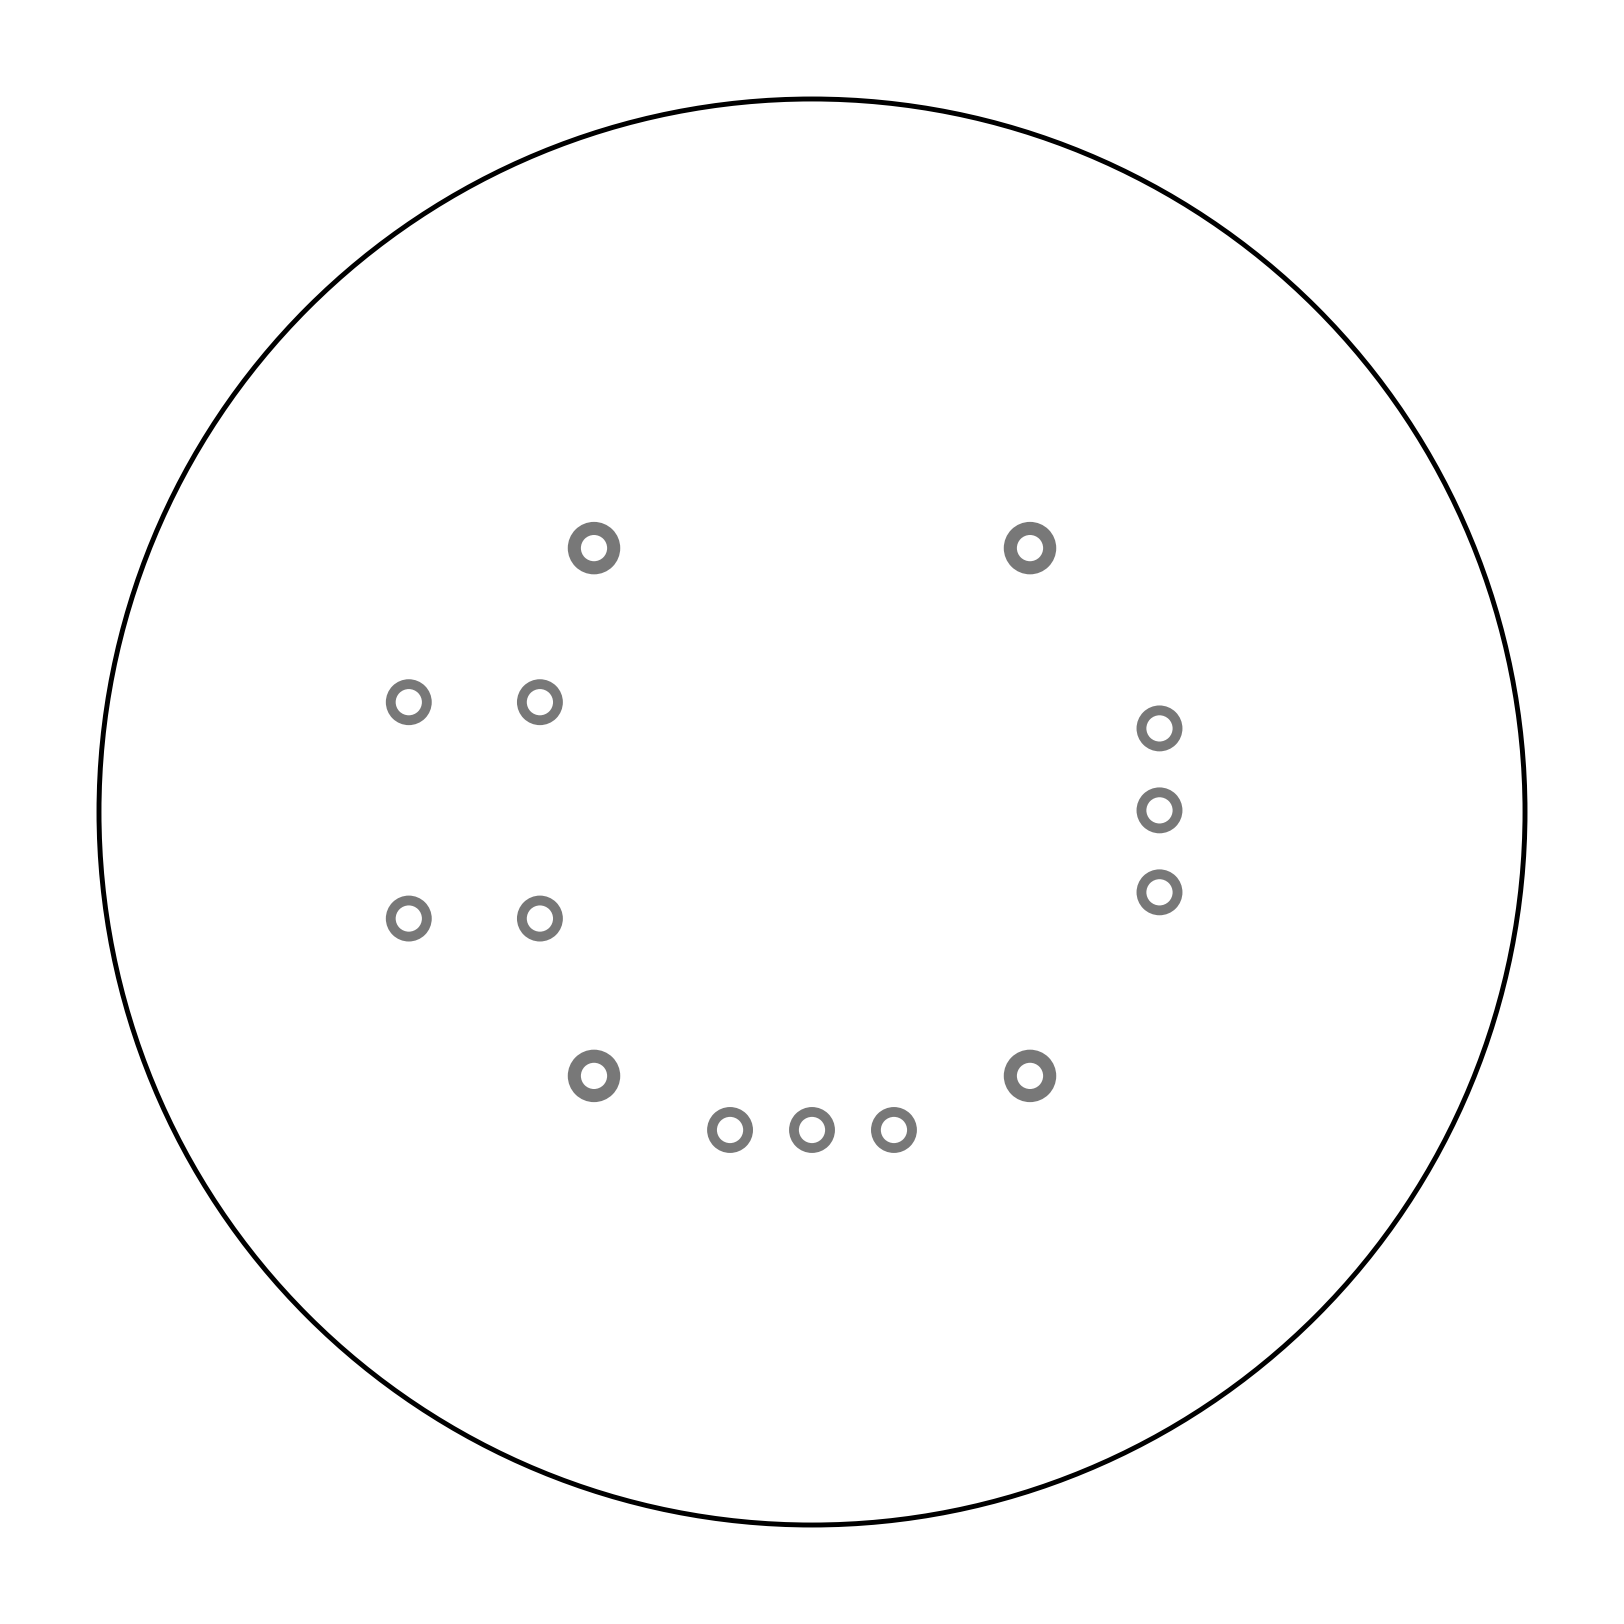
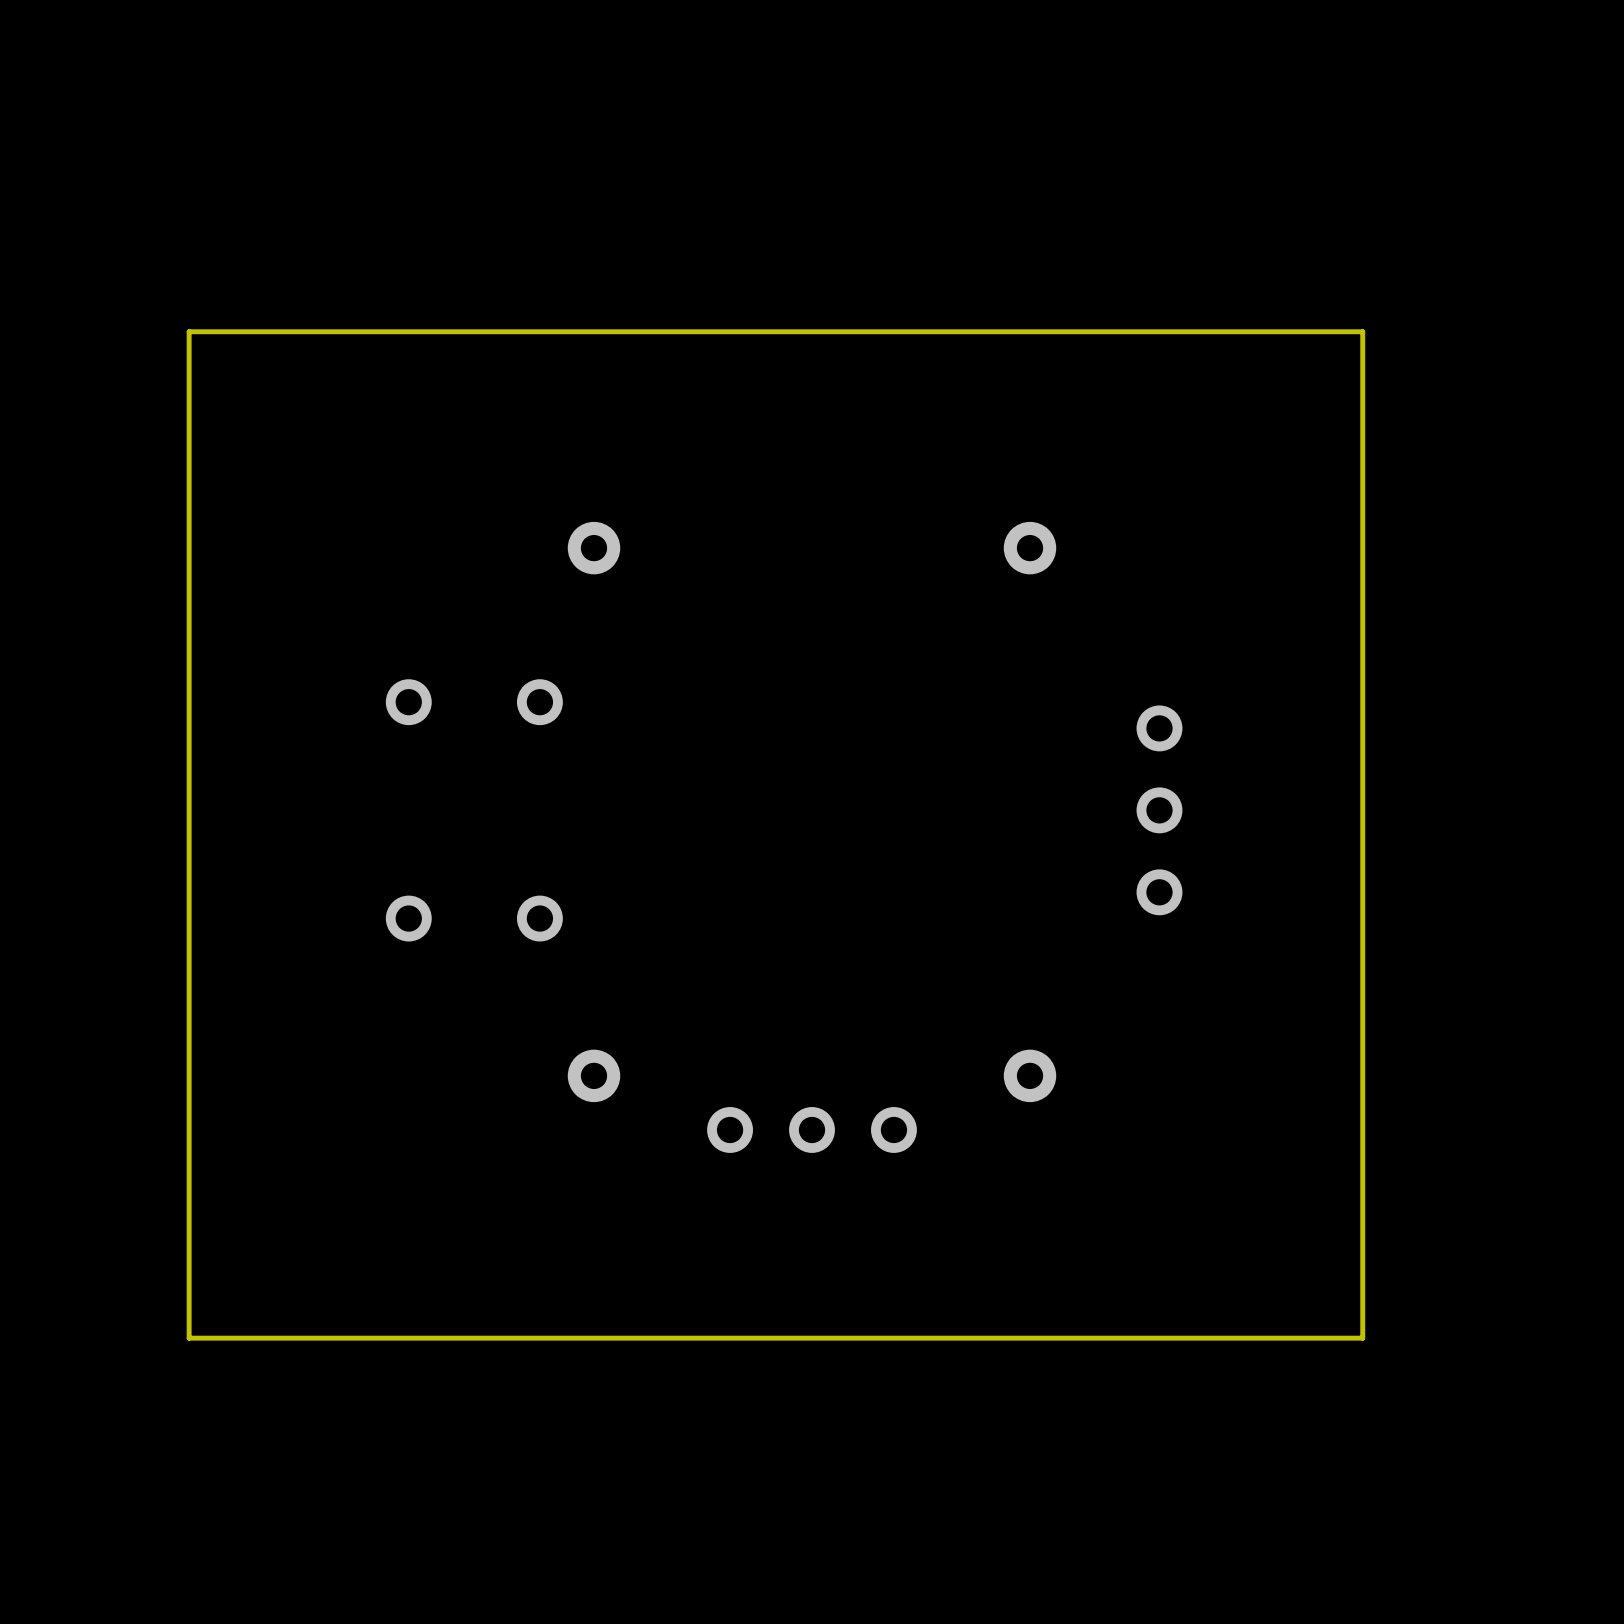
round board edge: [96, 96, 1528, 1528] -> none
board edge: none -> (189, 331) (1362, 331) (1362, 1338) (189, 1338) (189, 331)

